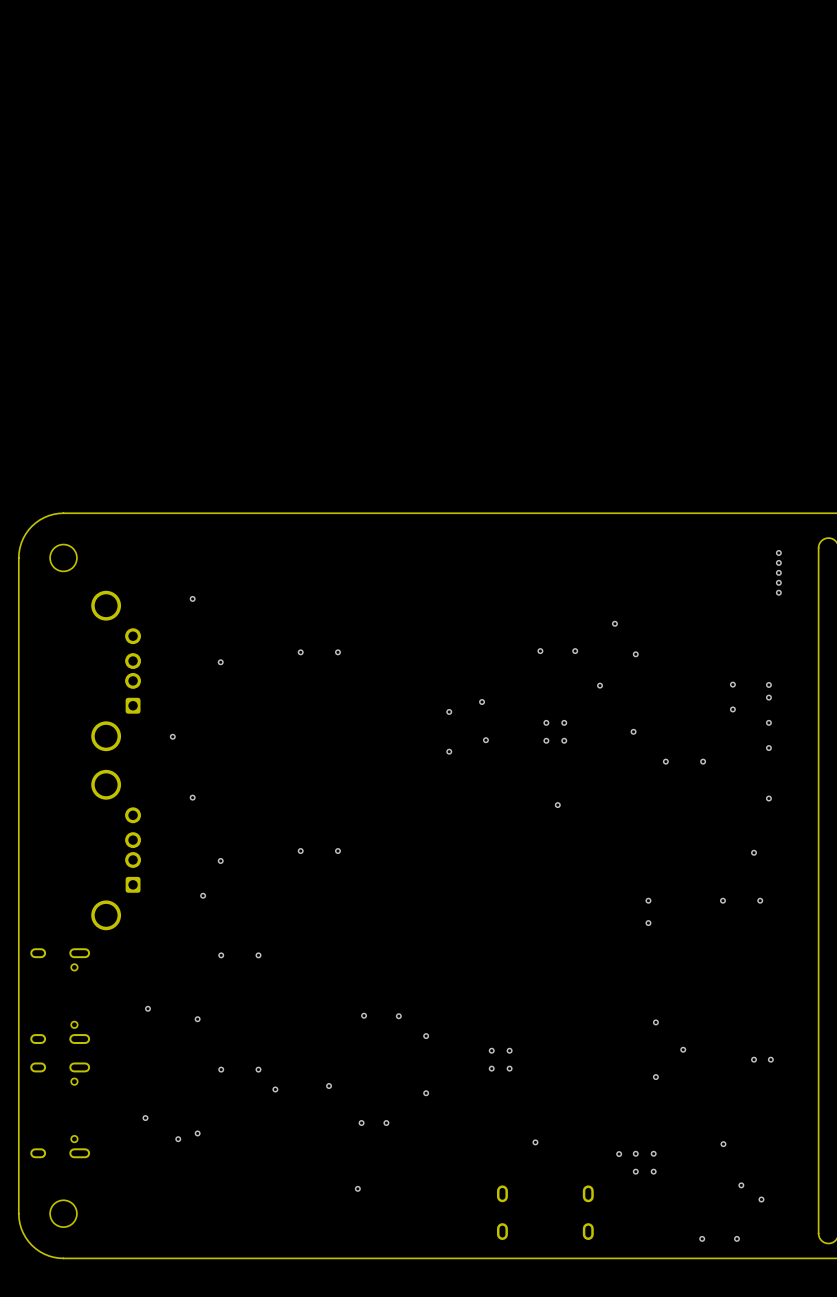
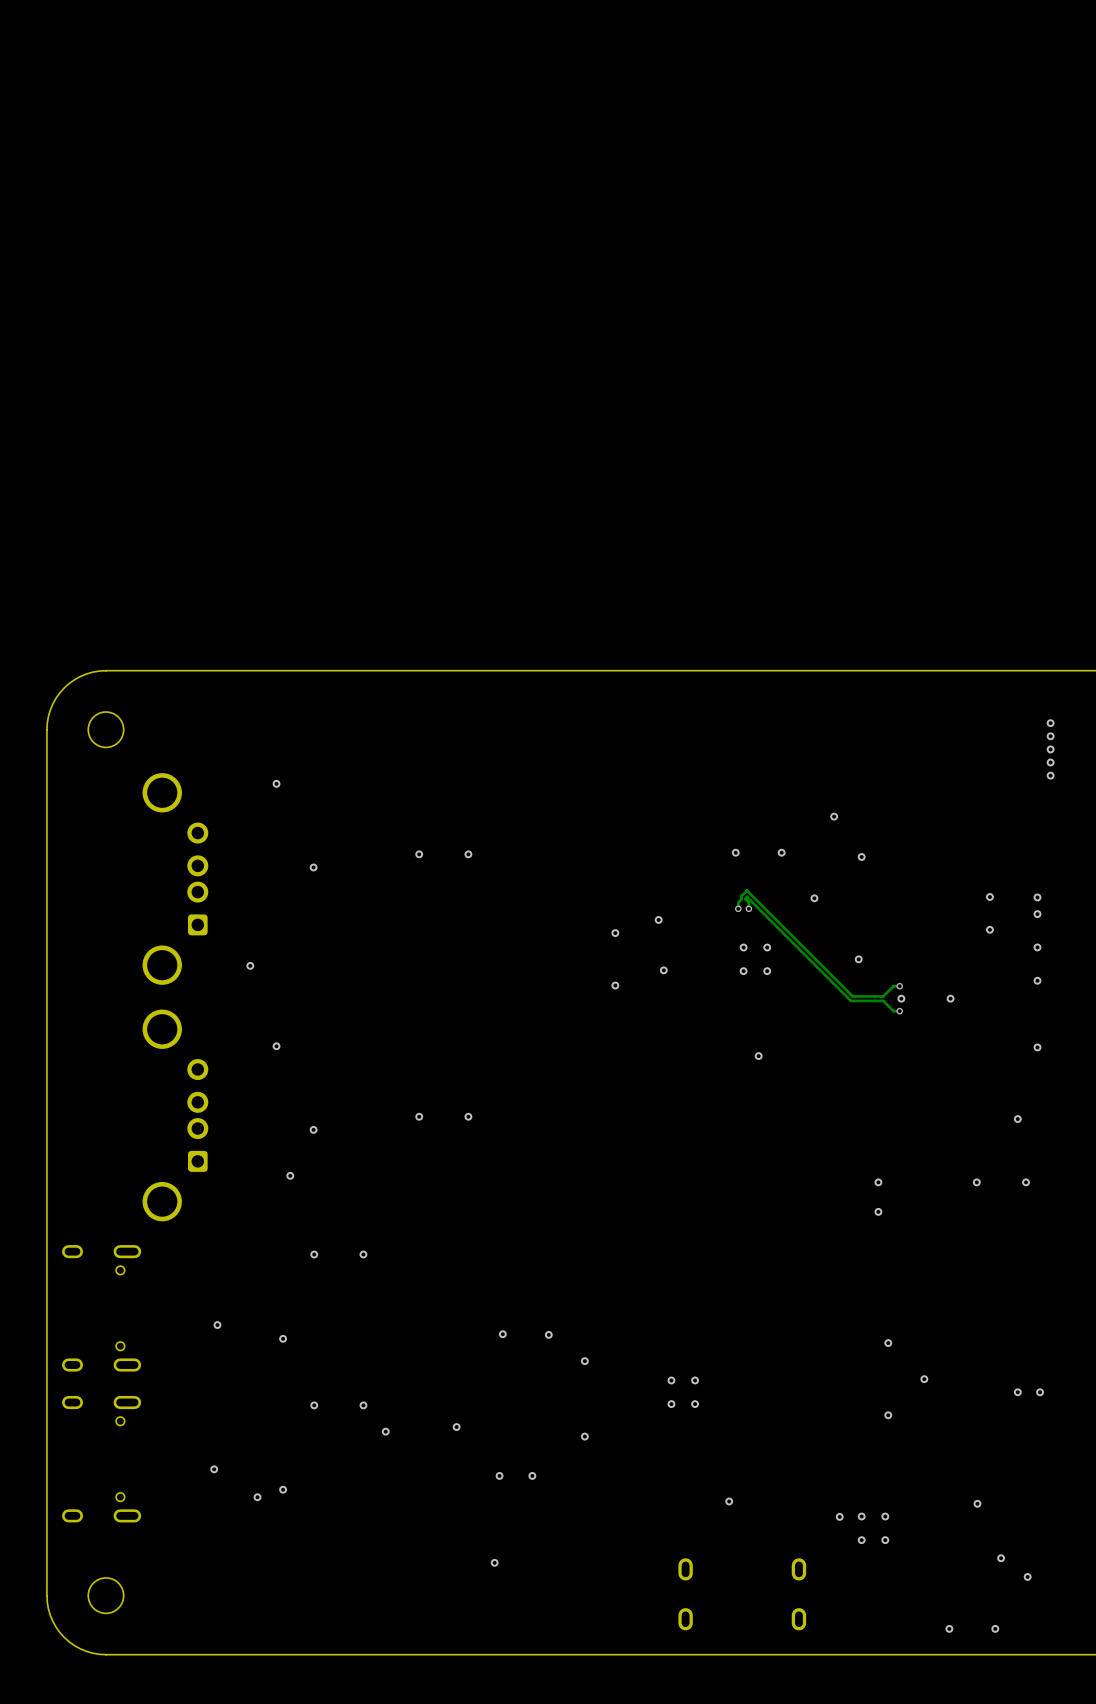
track: none -> (738, 908) (741, 896) (746, 890) (852, 996) (883, 996) (893, 986) (899, 986)
via: none -> (738, 908)
track: none -> (748, 908) (748, 902) (745, 899) (746, 896) (850, 1000) (883, 1000) (893, 1011) (899, 1011)
via: none -> (748, 908)
via: none -> (899, 986)
via: none -> (899, 1011)

